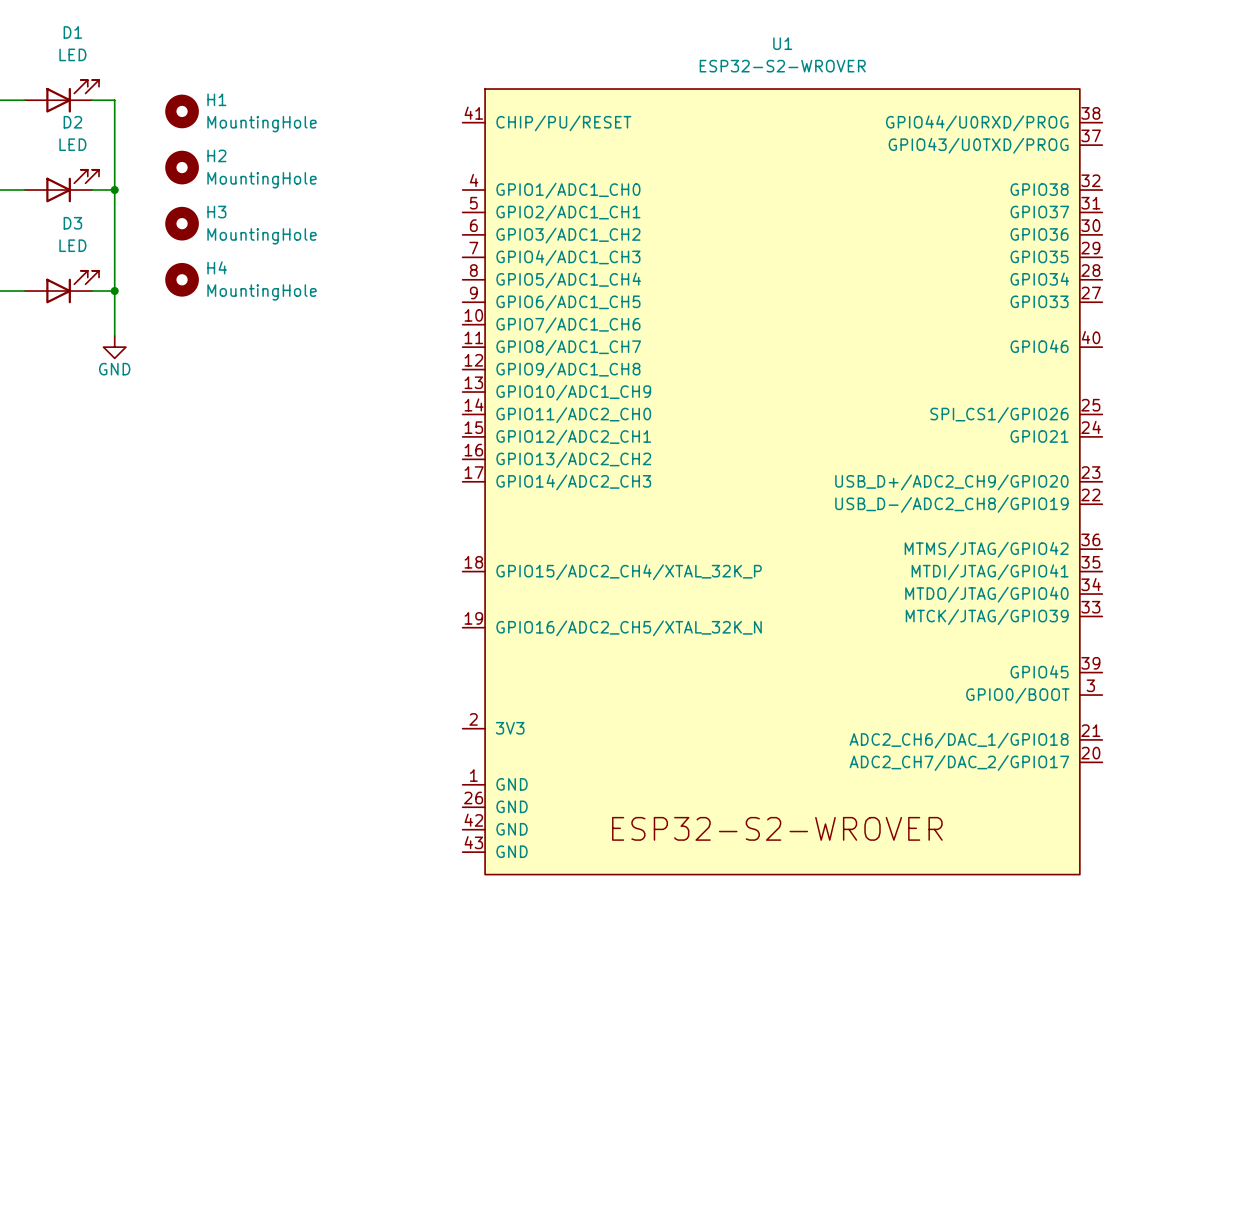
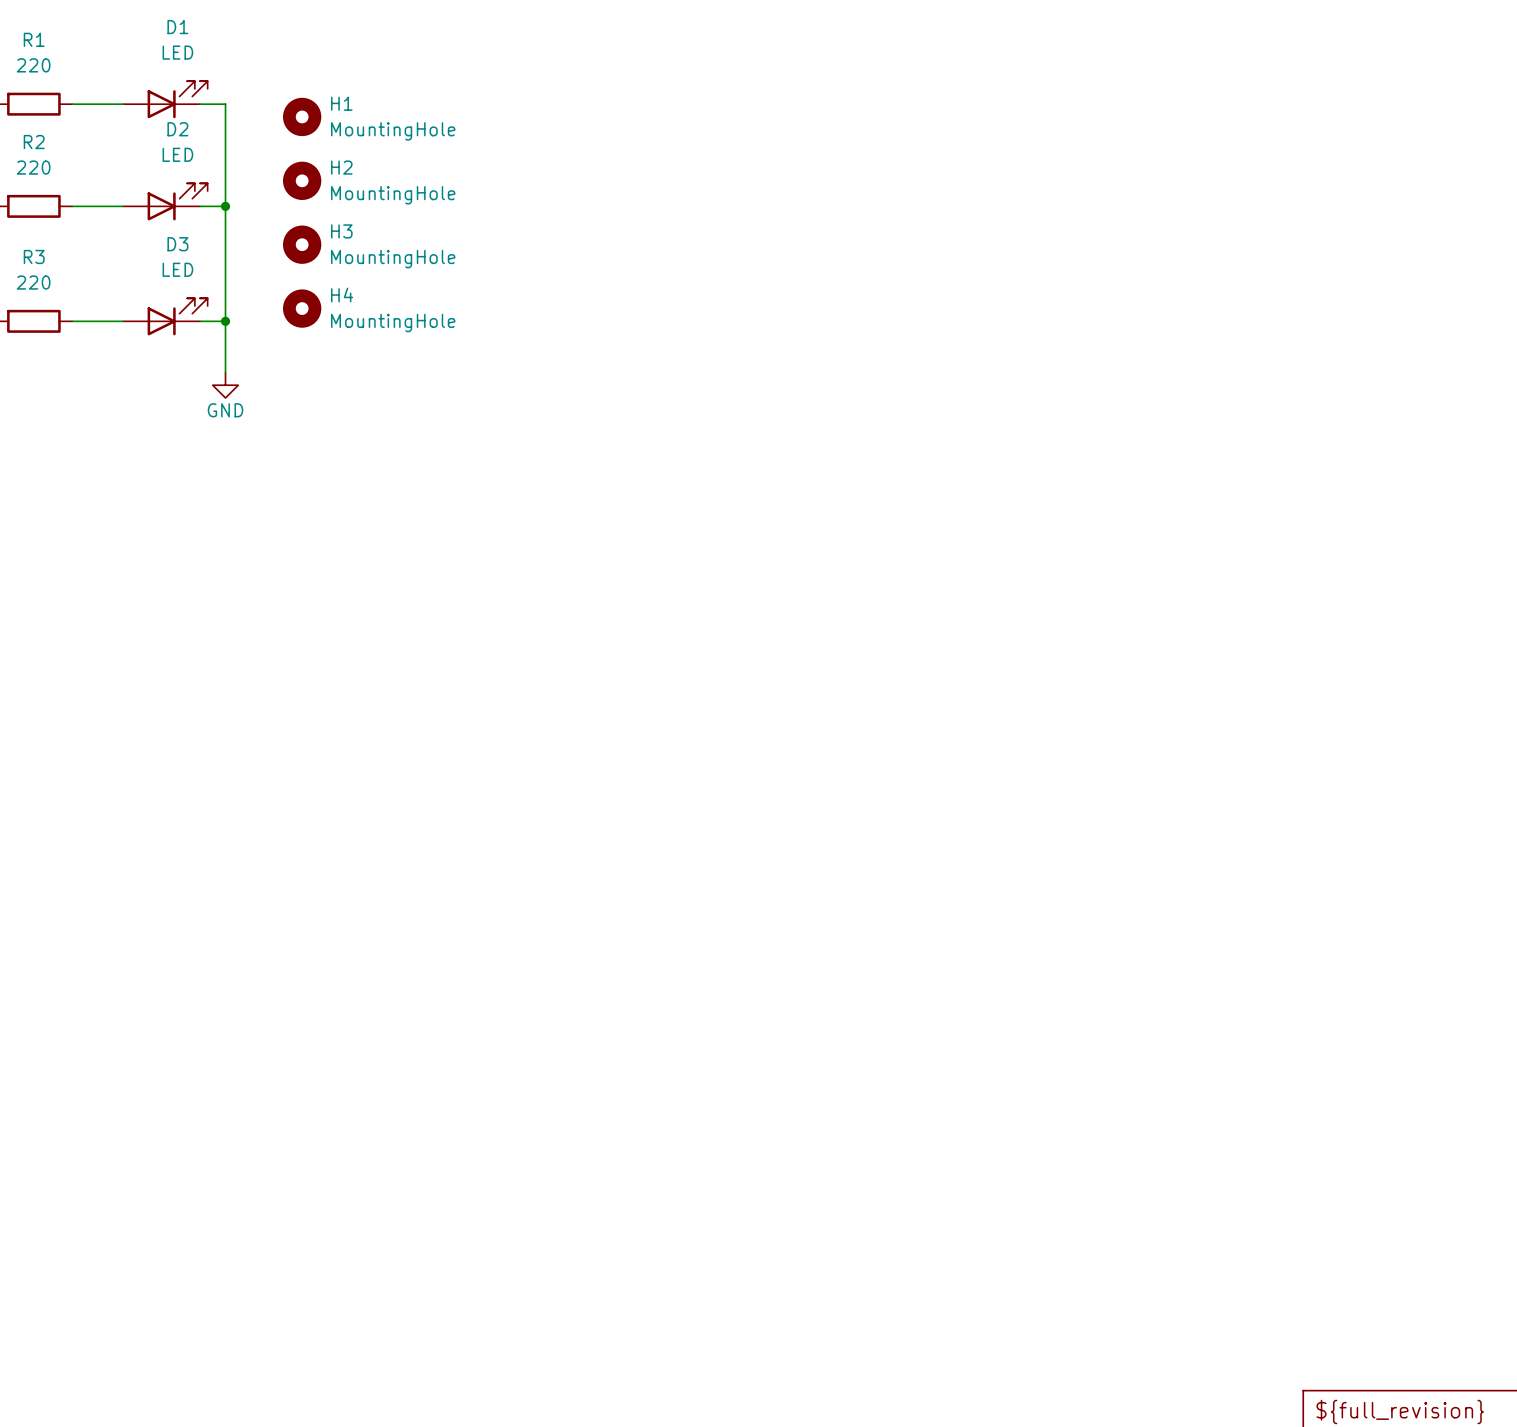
U1: ESP32-S2-WROVER (782, 481) -> none

